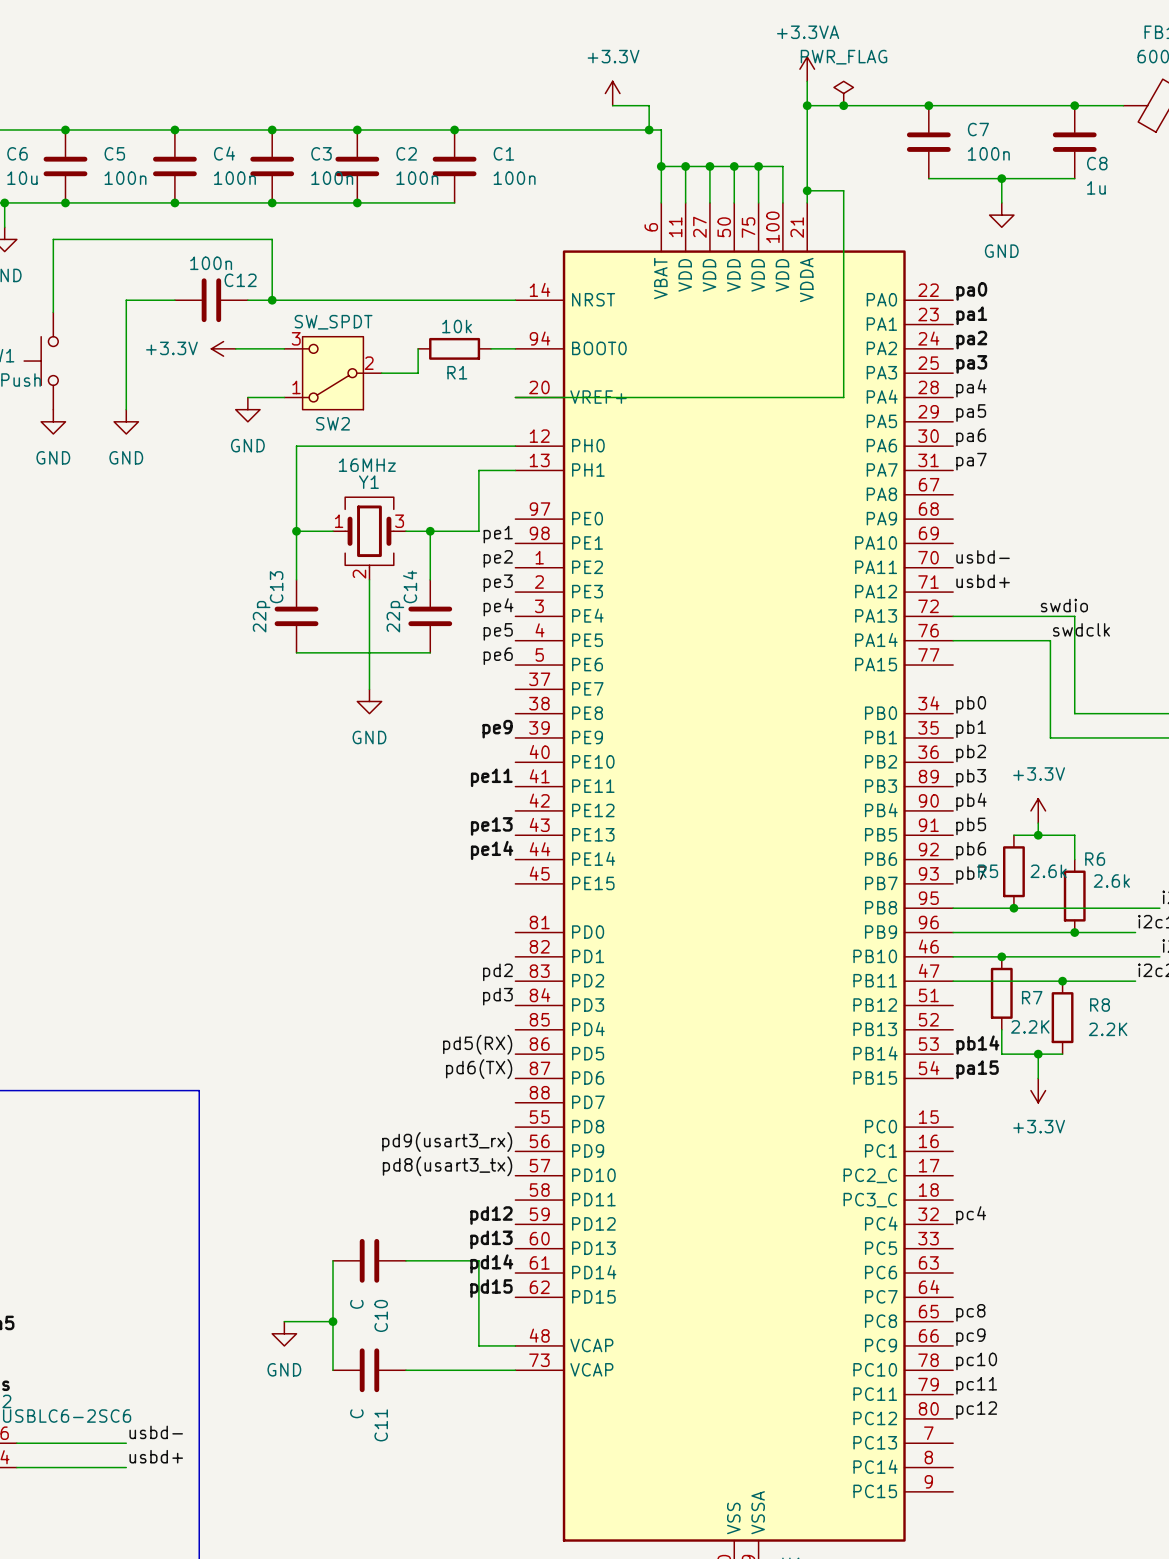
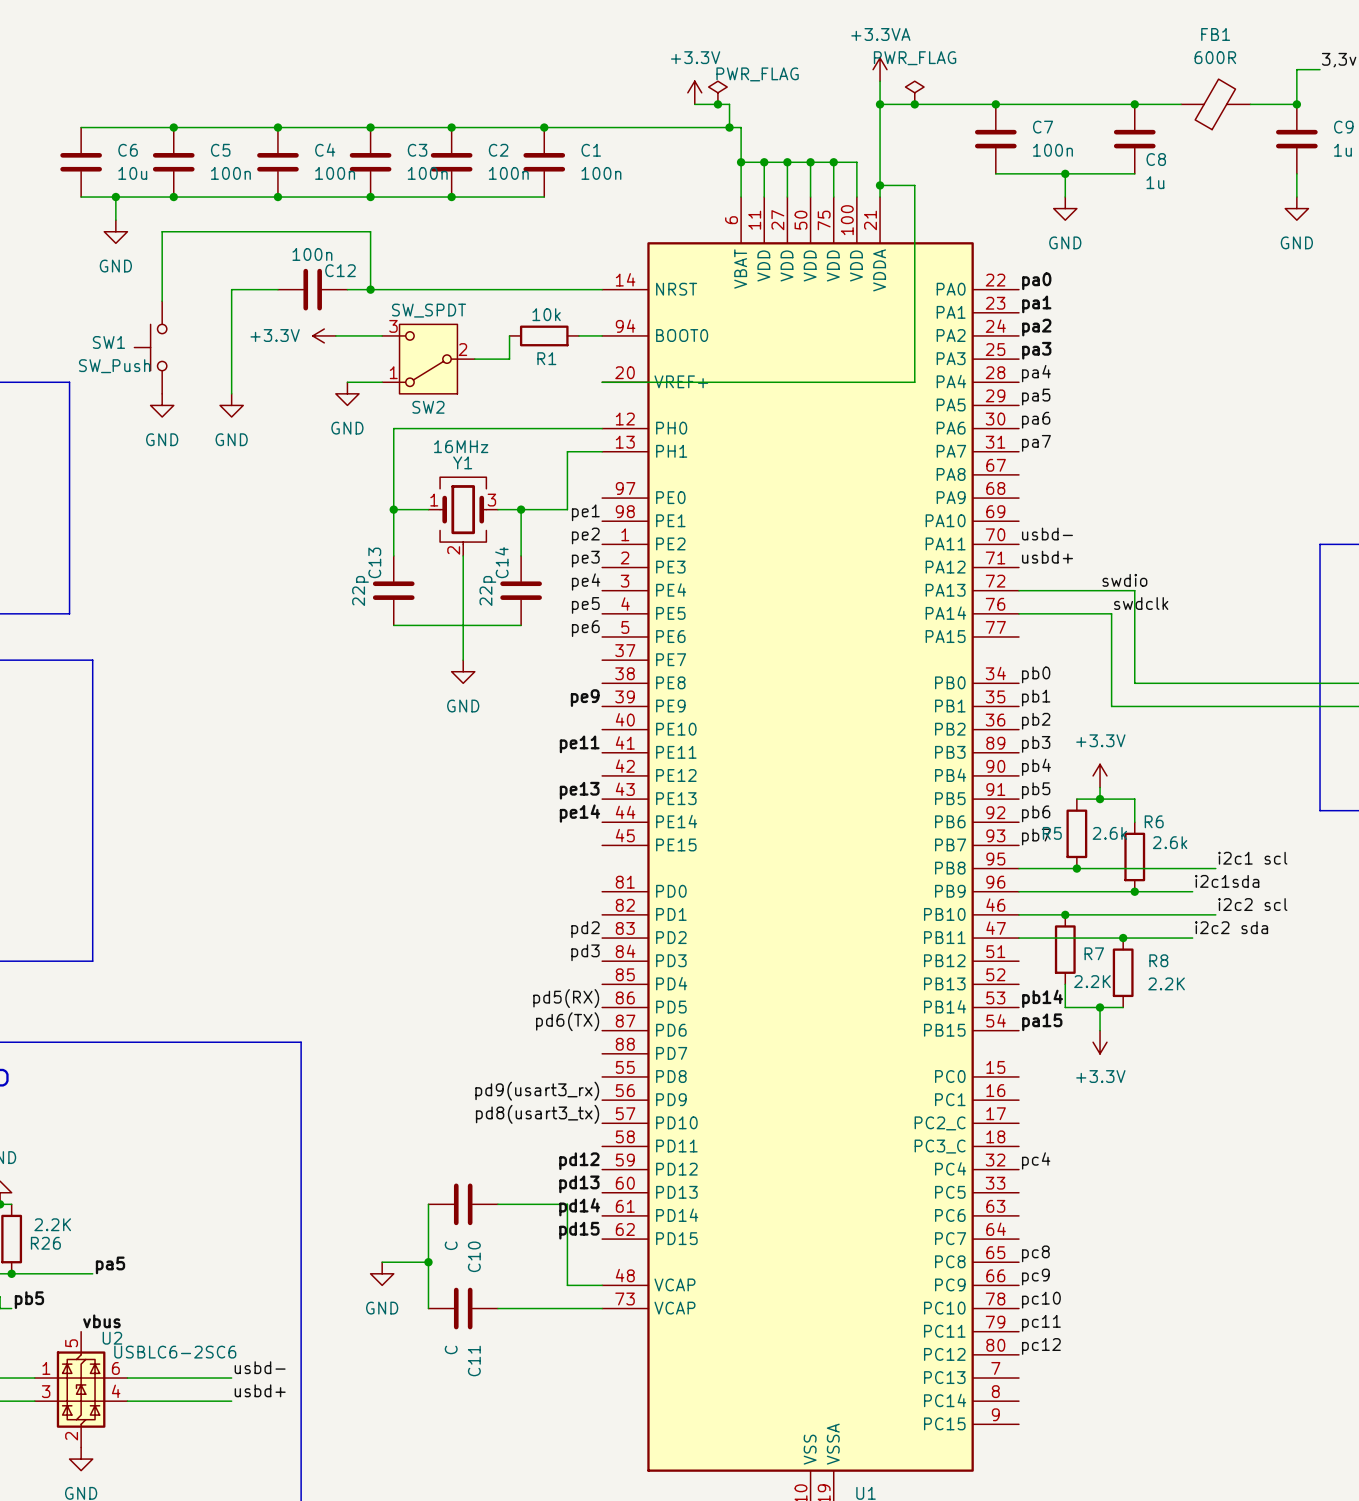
power symbol: none -> PWR_FLAG (717, 92)
junction: none -> (717, 104)

